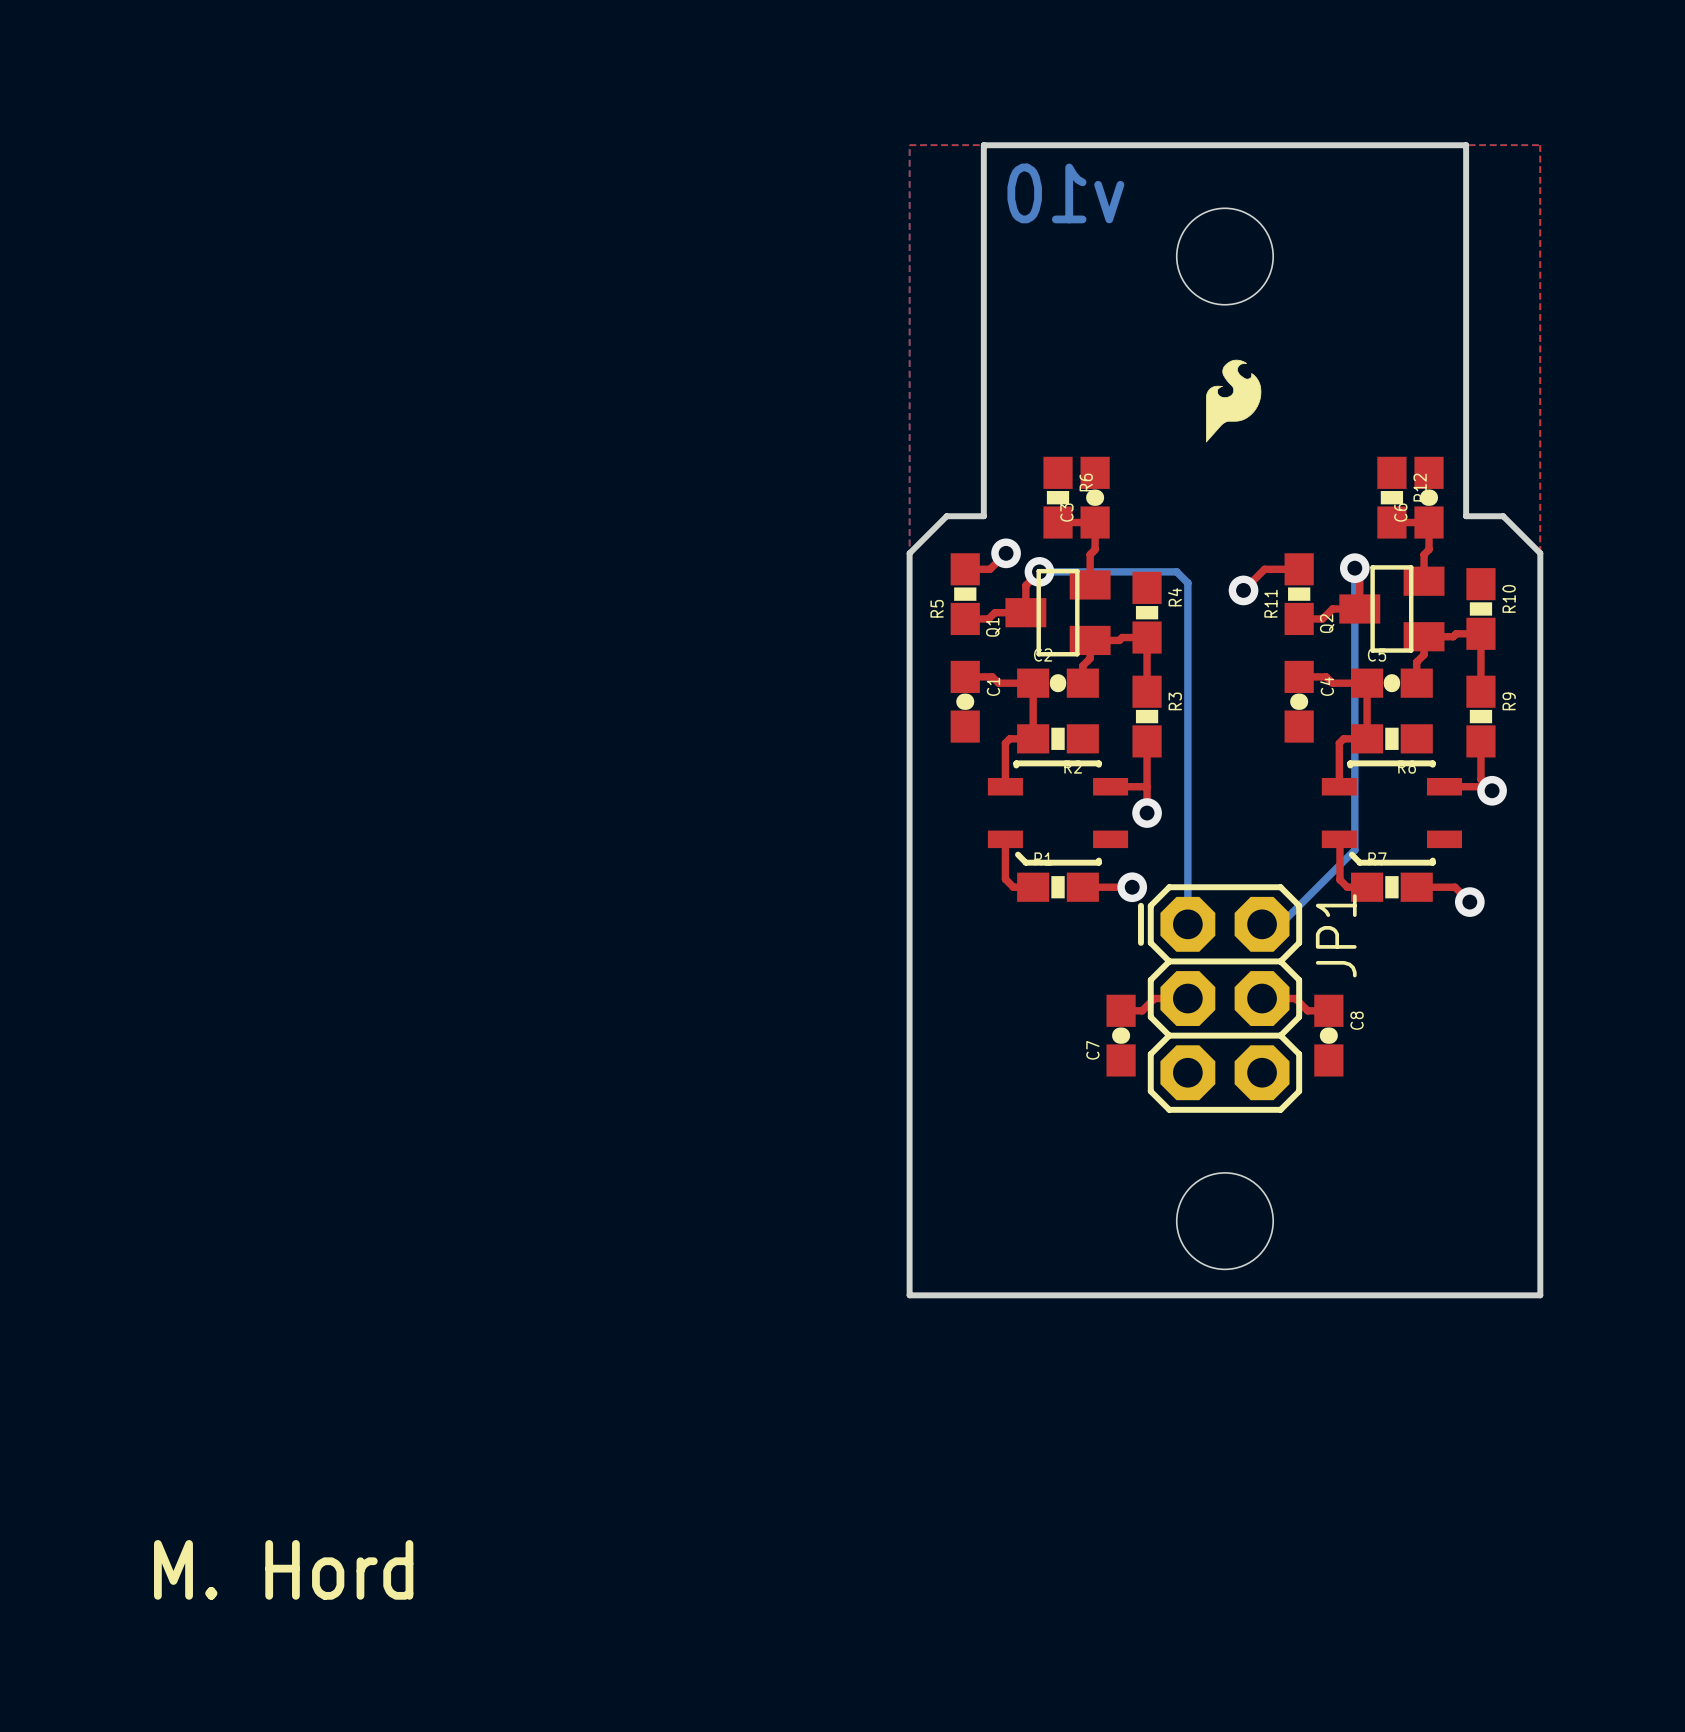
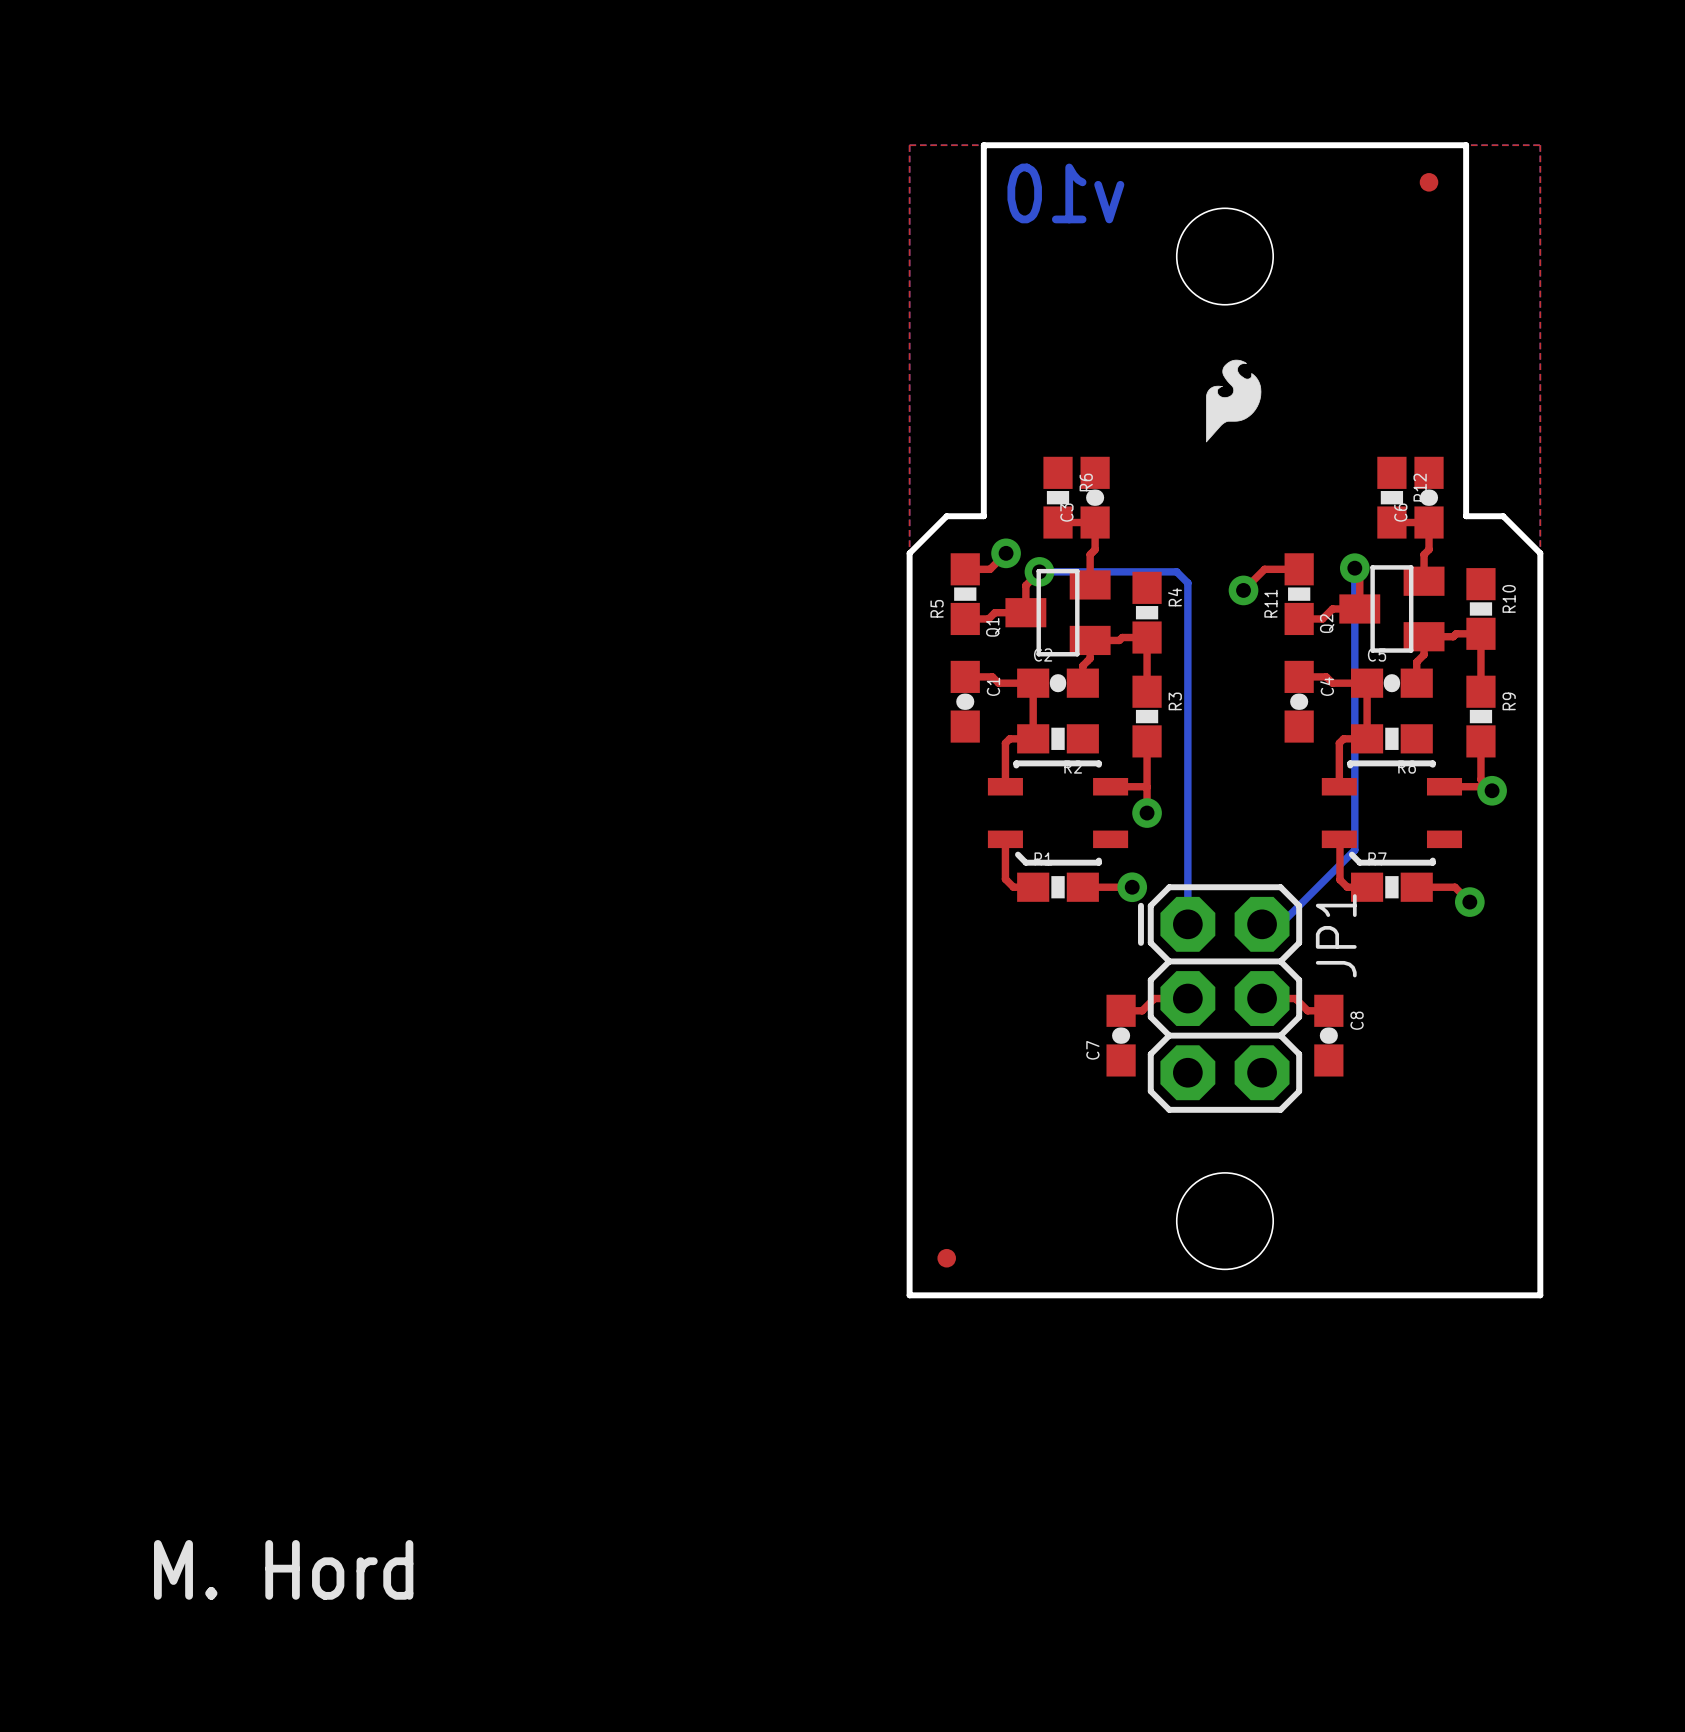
part: none -> (1429, 182)
part: none -> (946, 1258)

